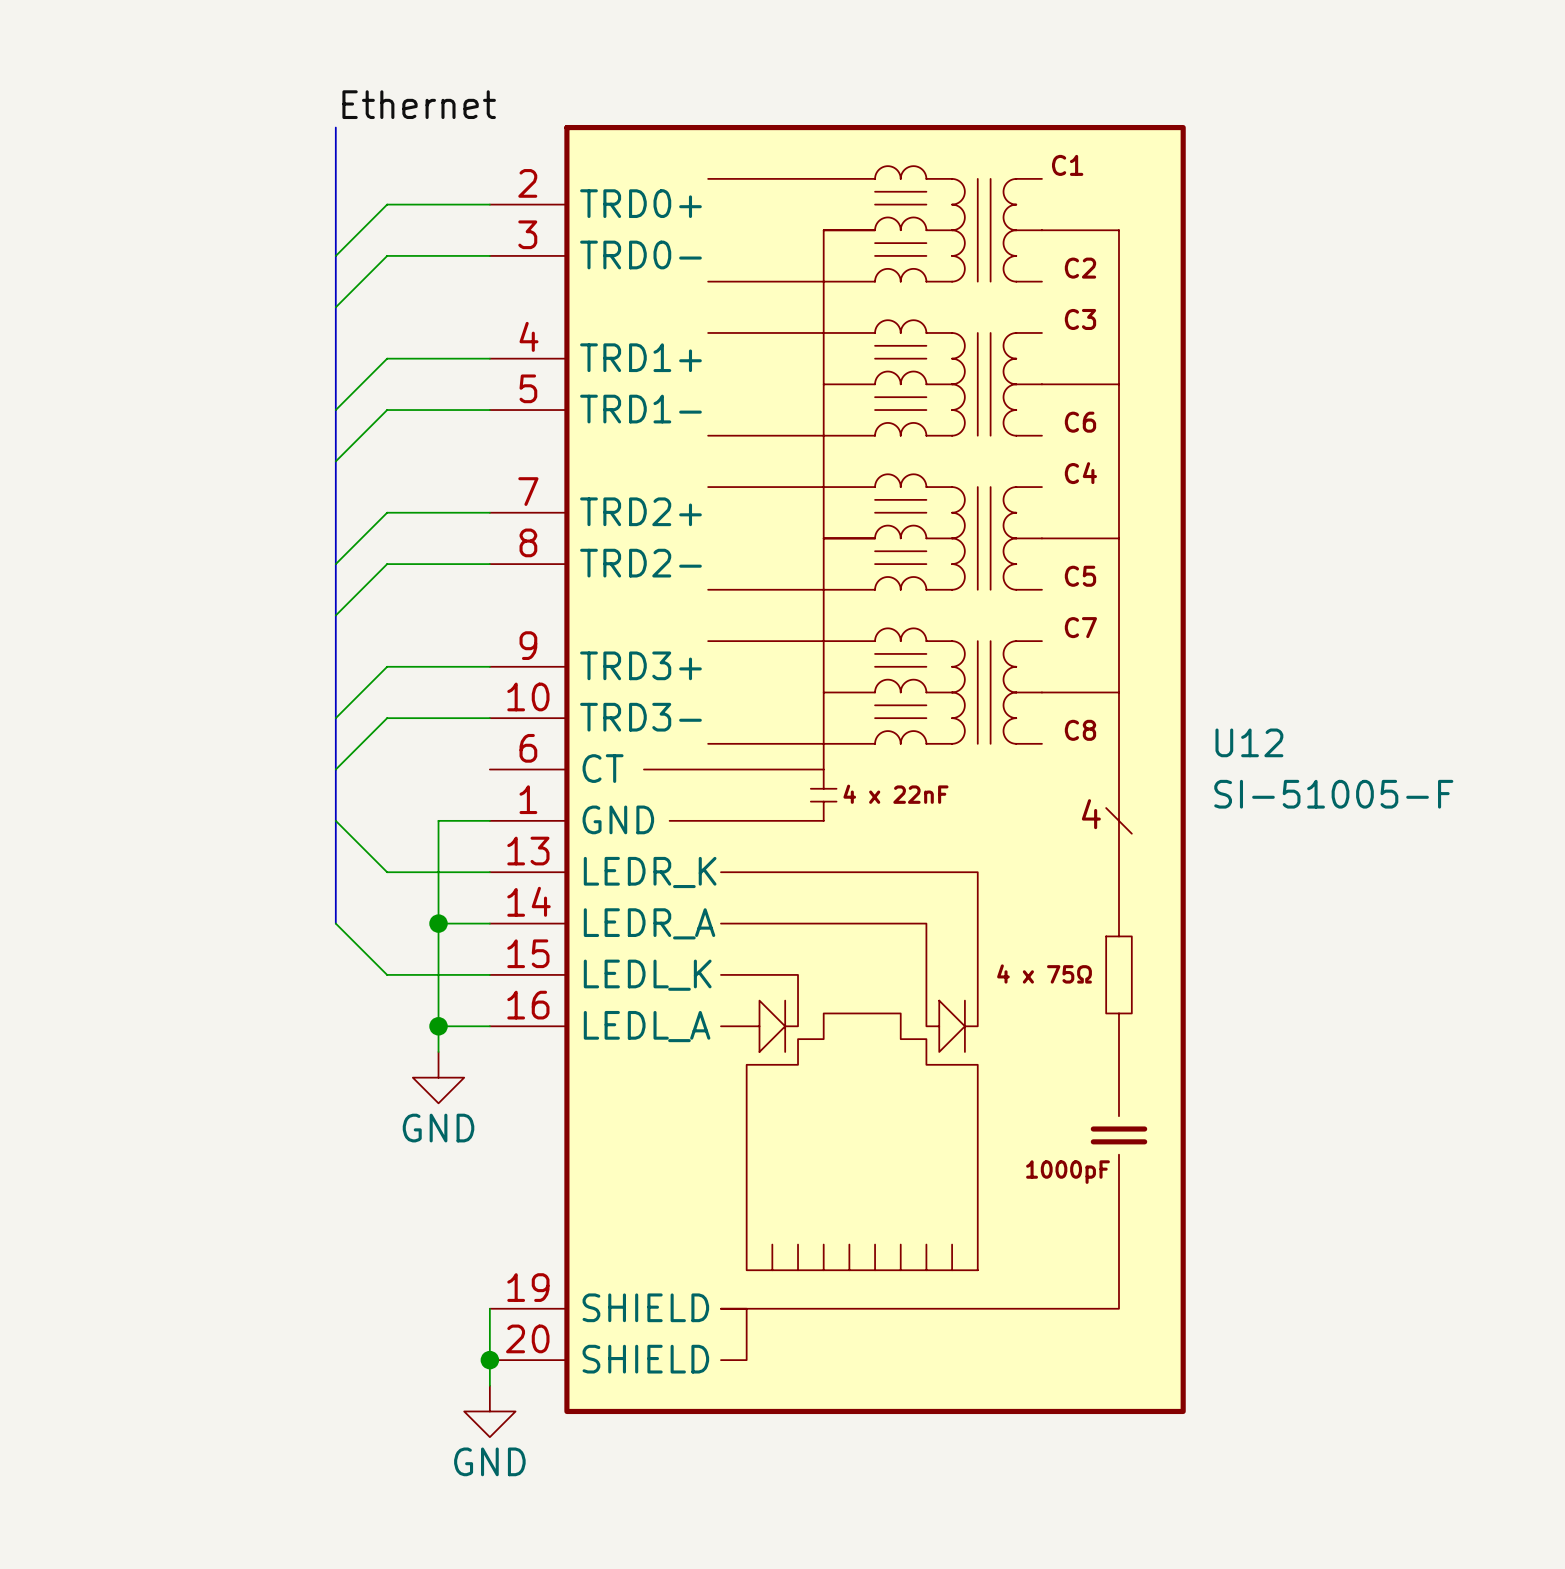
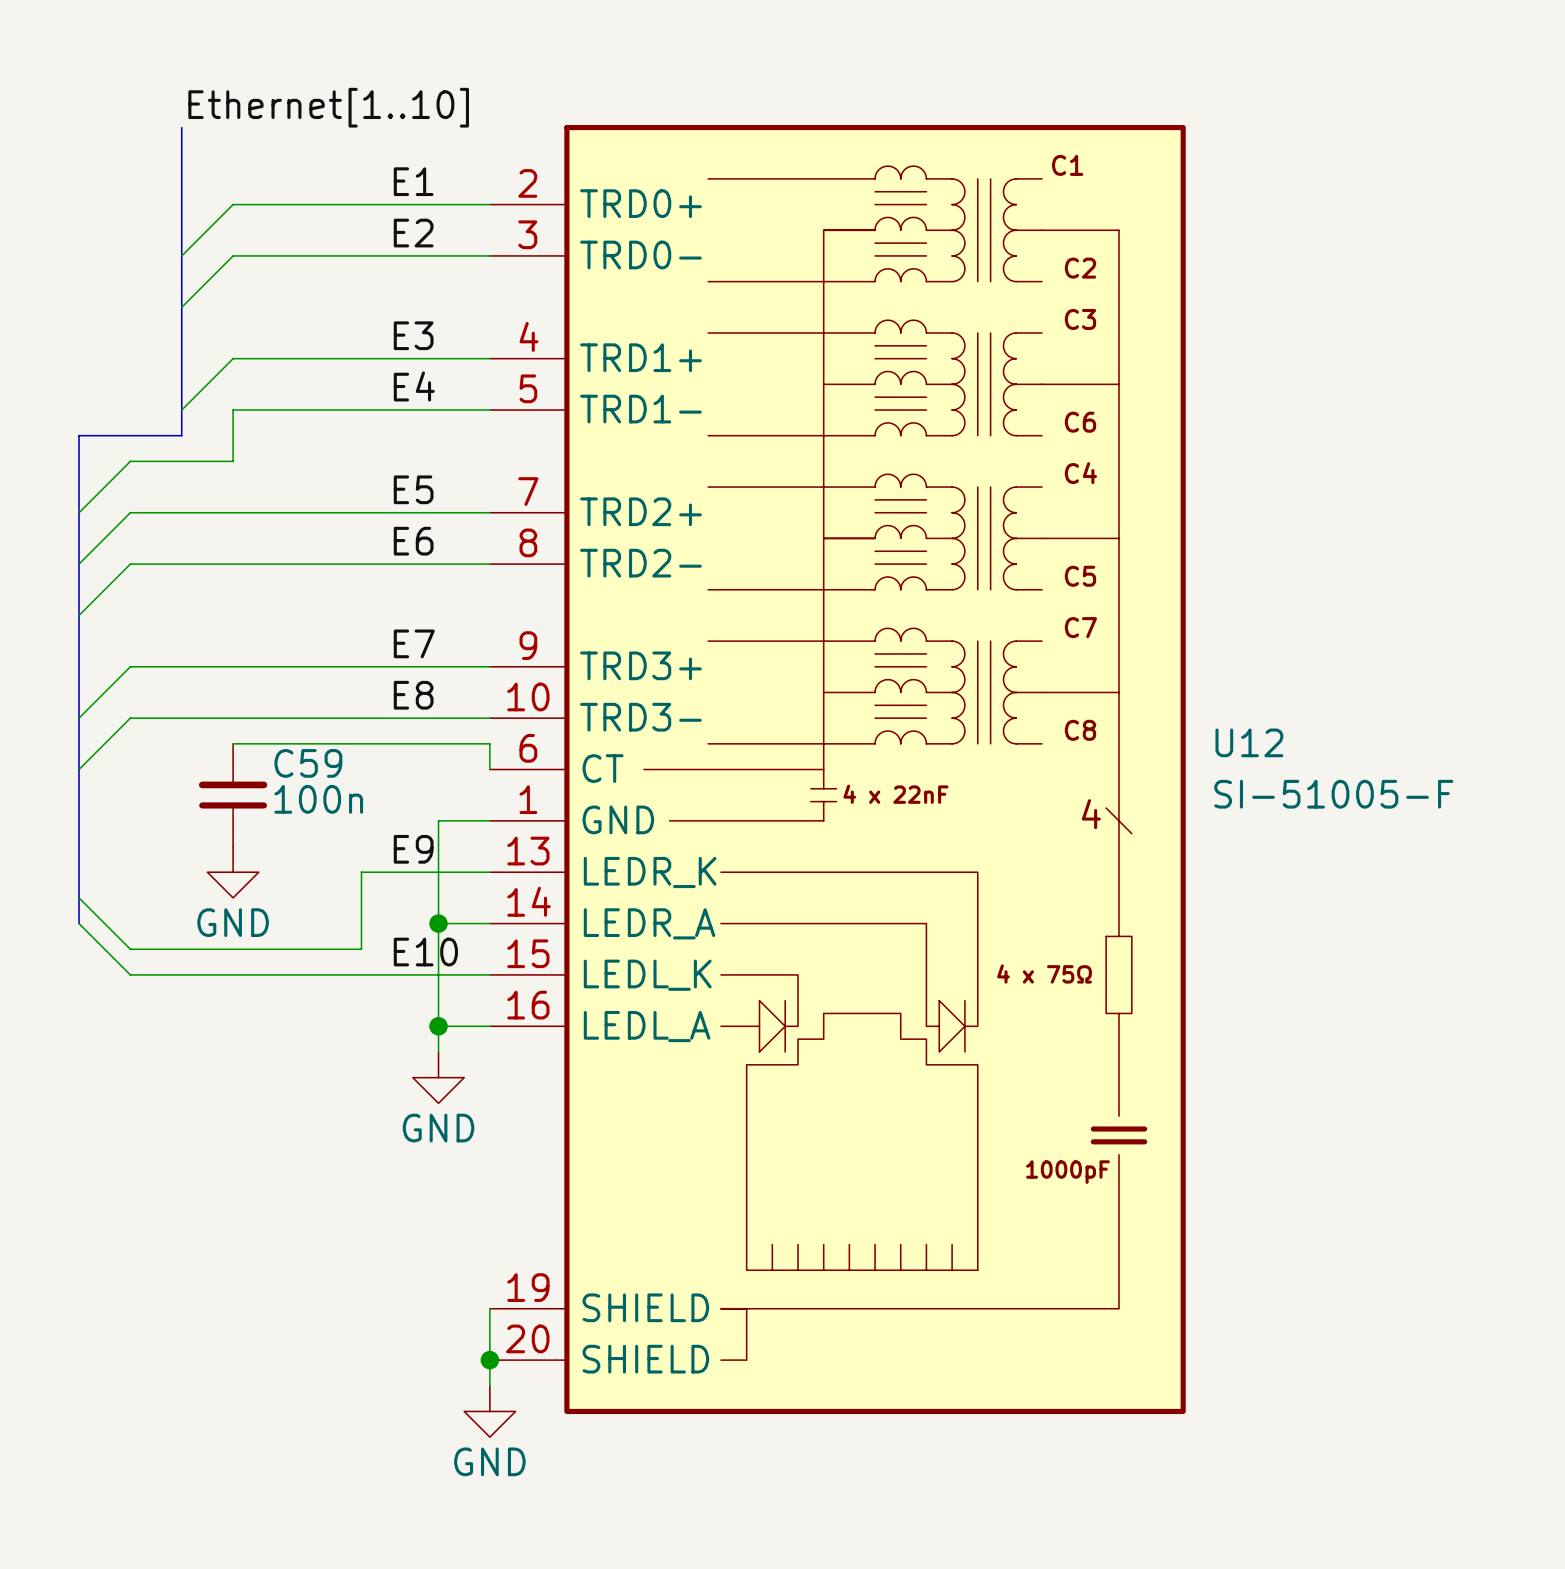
label: Ethernet (419, 104) -> Ethernet[1..10] (328, 107)
bus: none -> (181, 127) (181, 435) (79, 435) (79, 923)
bus: (335, 127) (335, 923) -> none
label: none -> E1 (413, 181)
wire: (387, 204) (335, 255) -> (387, 204) (233, 204) (181, 255)
label: none -> E2 (413, 233)
wire: (387, 255) (335, 307) -> (387, 255) (233, 255) (181, 307)
label: none -> E3 (413, 335)
wire: (387, 358) (335, 410) -> (387, 358) (233, 358) (181, 410)
label: none -> E4 (414, 386)
wire: (387, 410) (335, 461) -> (387, 410) (233, 410) (233, 461) (130, 461) (79, 512)
label: none -> E5 (413, 489)
wire: (387, 512) (335, 564) -> (387, 512) (130, 512) (79, 564)
label: none -> E6 (413, 541)
wire: (387, 564) (335, 615) -> (387, 564) (130, 564) (79, 615)
label: none -> E7 (414, 643)
wire: (387, 666) (335, 718) -> (387, 666) (130, 666) (79, 718)
label: none -> E8 (413, 695)
wire: (387, 718) (335, 769) -> (387, 718) (130, 718) (79, 769)
wire: none -> (233, 743) (489, 743) (489, 769)
C59: none -> 100n (233, 795)
wire: (335, 820) (387, 872) -> (79, 897) (130, 949) (361, 949) (361, 872) (387, 872)
label: none -> E9 (413, 849)
power symbol: none -> GND (233, 872)
wire: (335, 923) (387, 974) -> (79, 923) (130, 974) (387, 974)
label: none -> E10 (425, 952)

